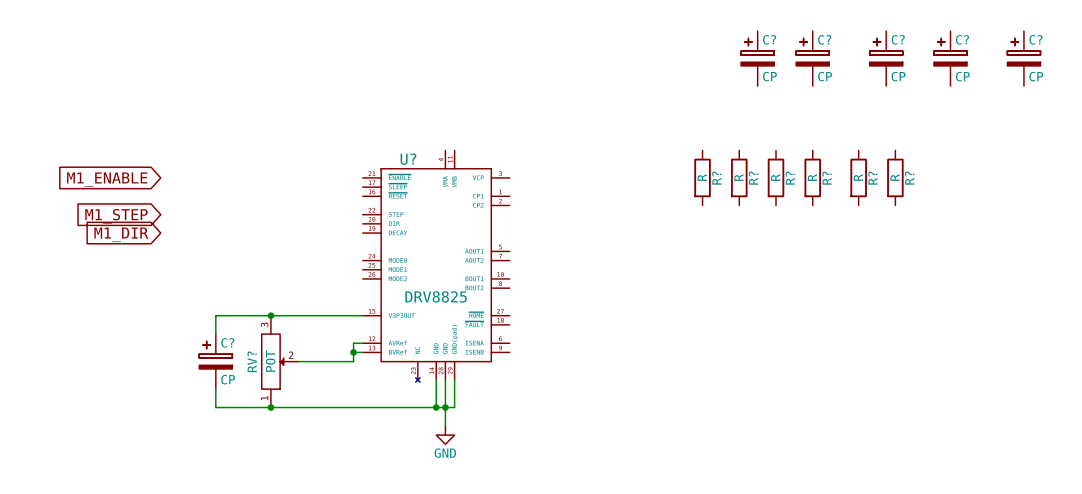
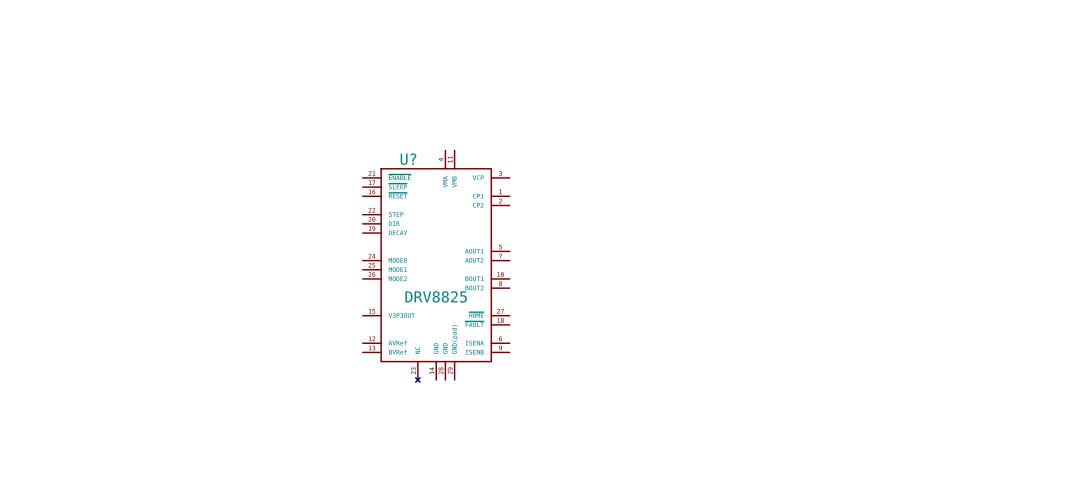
C?: CP (757, 58) -> none
C?: CP (812, 58) -> none
C?: CP (886, 58) -> none
C?: CP (950, 58) -> none
C?: CP (1023, 58) -> none
R?: R (702, 177) -> none
R?: R (739, 177) -> none
R?: R (776, 177) -> none
R?: R (812, 177) -> none
R?: R (858, 177) -> none
R?: R (895, 177) -> none
global label: M1_ENABLE (107, 179) -> none
global label: M1_STEP (116, 216) -> none
global label: M1_DIR (121, 234) -> none
junction: (270, 315) -> none
wire: (362, 315) (215, 315) (215, 334) -> none
wire: (362, 343) (353, 343) (353, 361) (298, 361) -> none
wire: (353, 352) (362, 352) -> none
junction: (353, 352) -> none
C?: CP (215, 361) -> none
RV?: POT (280, 361) -> none
wire: (436, 379) (436, 407) -> none
wire: (445, 379) (445, 425) -> none
wire: (454, 379) (454, 407) (215, 407) (215, 389) -> none
junction: (270, 407) -> none
junction: (436, 407) -> none
junction: (445, 407) -> none
power symbol: GND (445, 435) -> none

